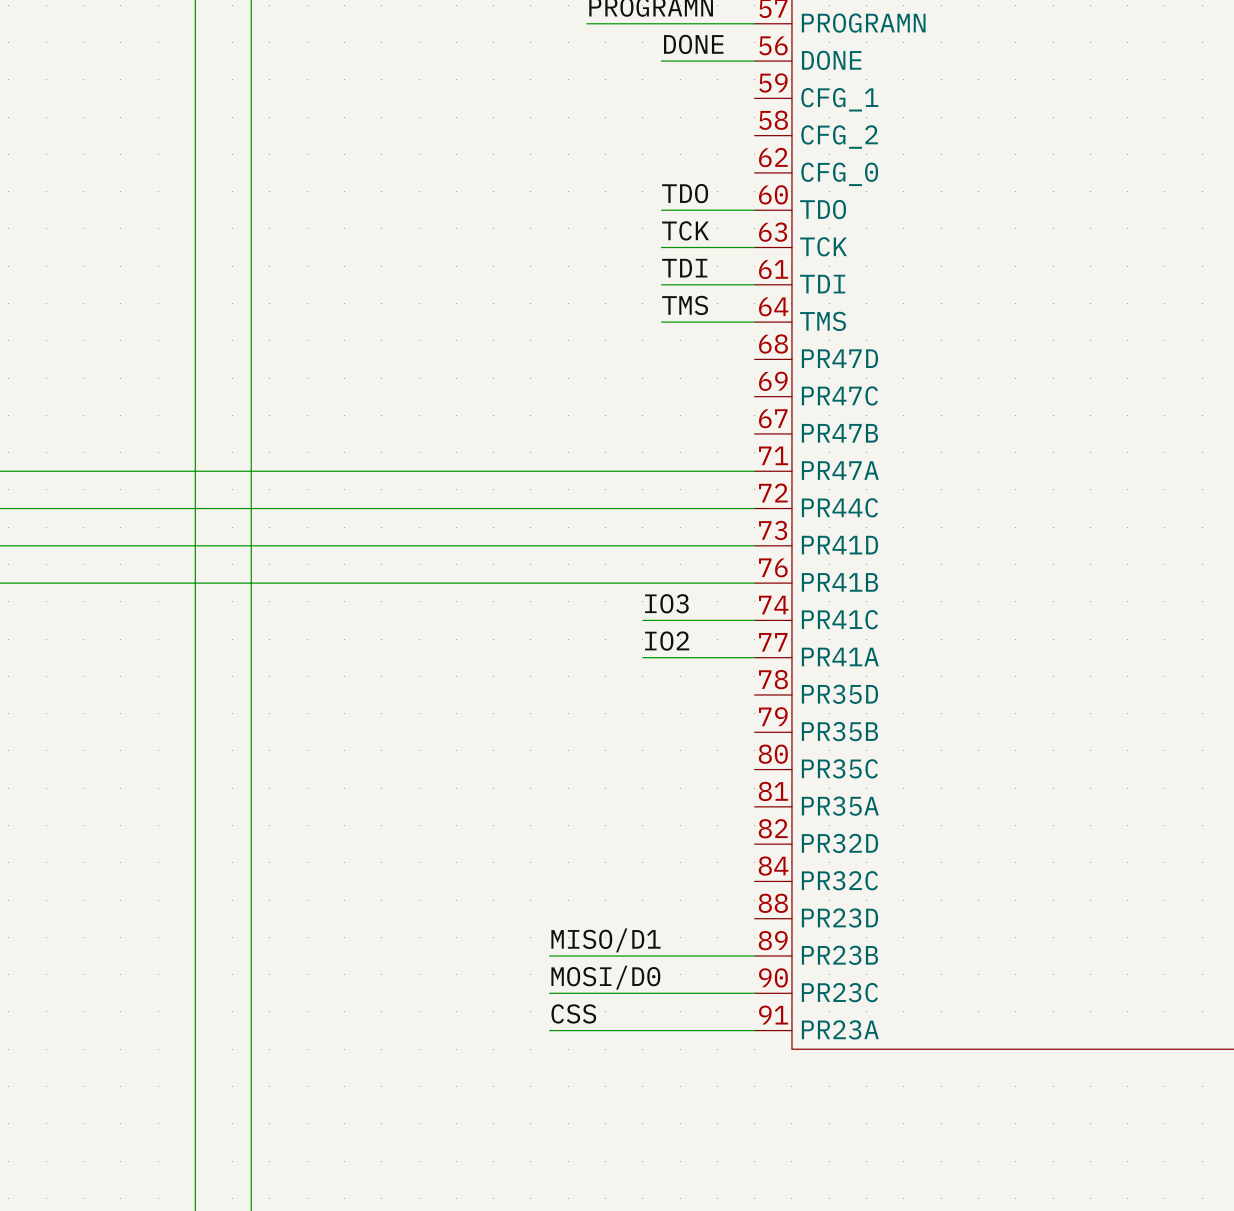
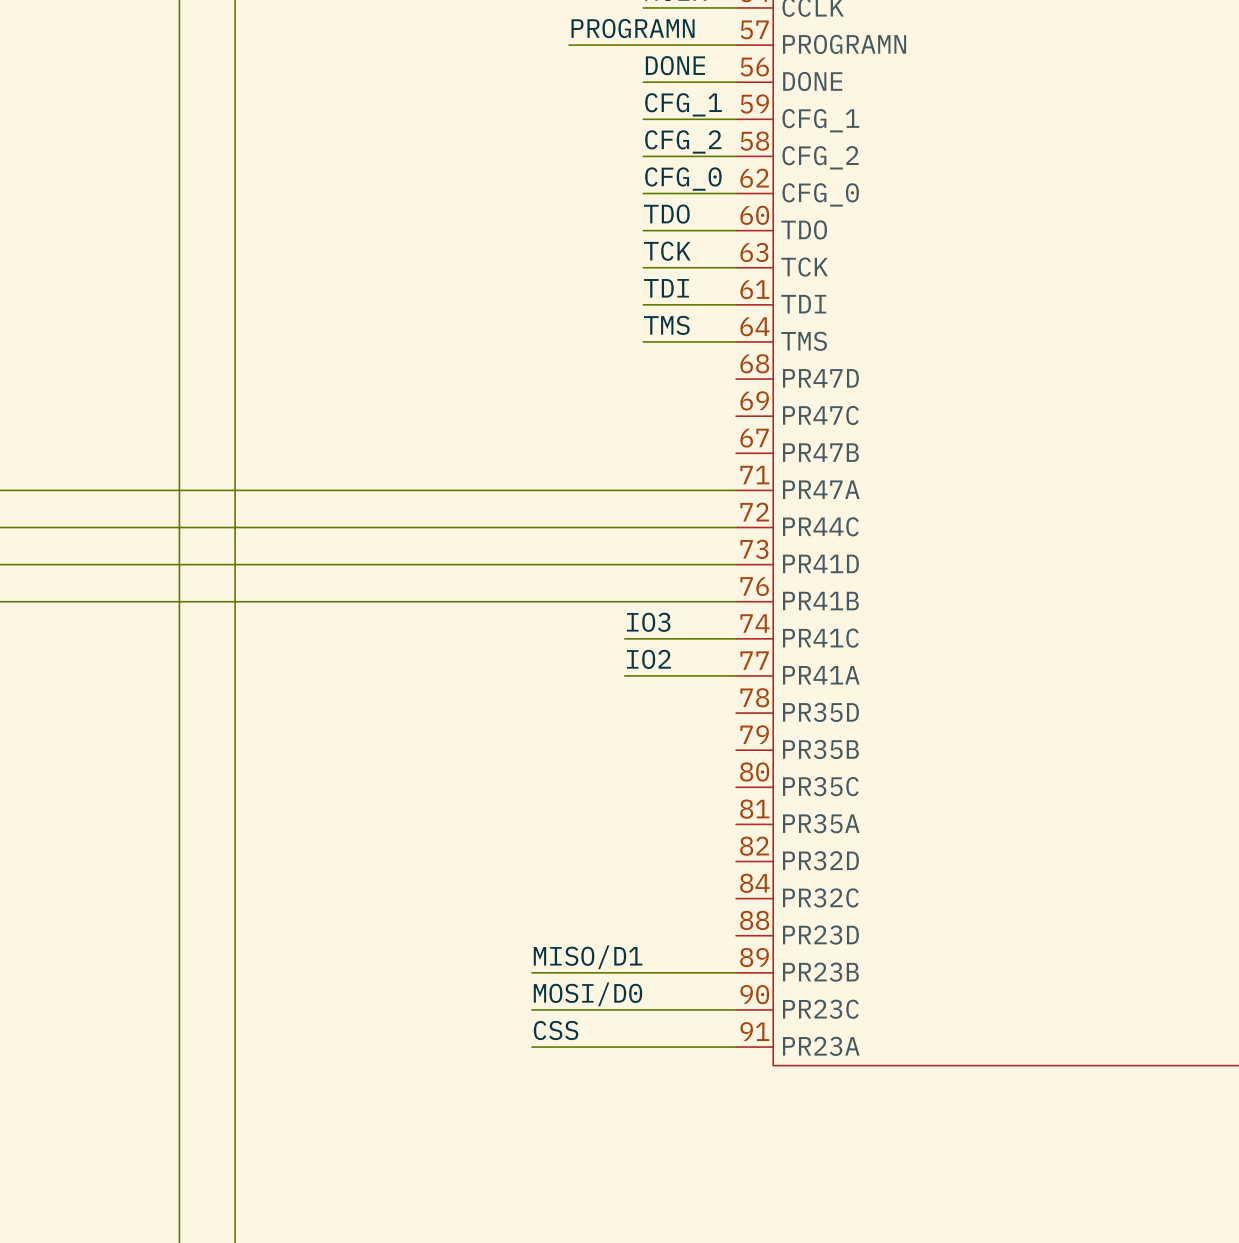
label: none -> CFG_1 (683, 104)
wire: none -> (643, 119) (736, 119)
label: none -> CFG_2 (683, 141)
wire: none -> (643, 156) (736, 156)
label: none -> CFG_0 (683, 179)
wire: none -> (643, 193) (736, 193)

